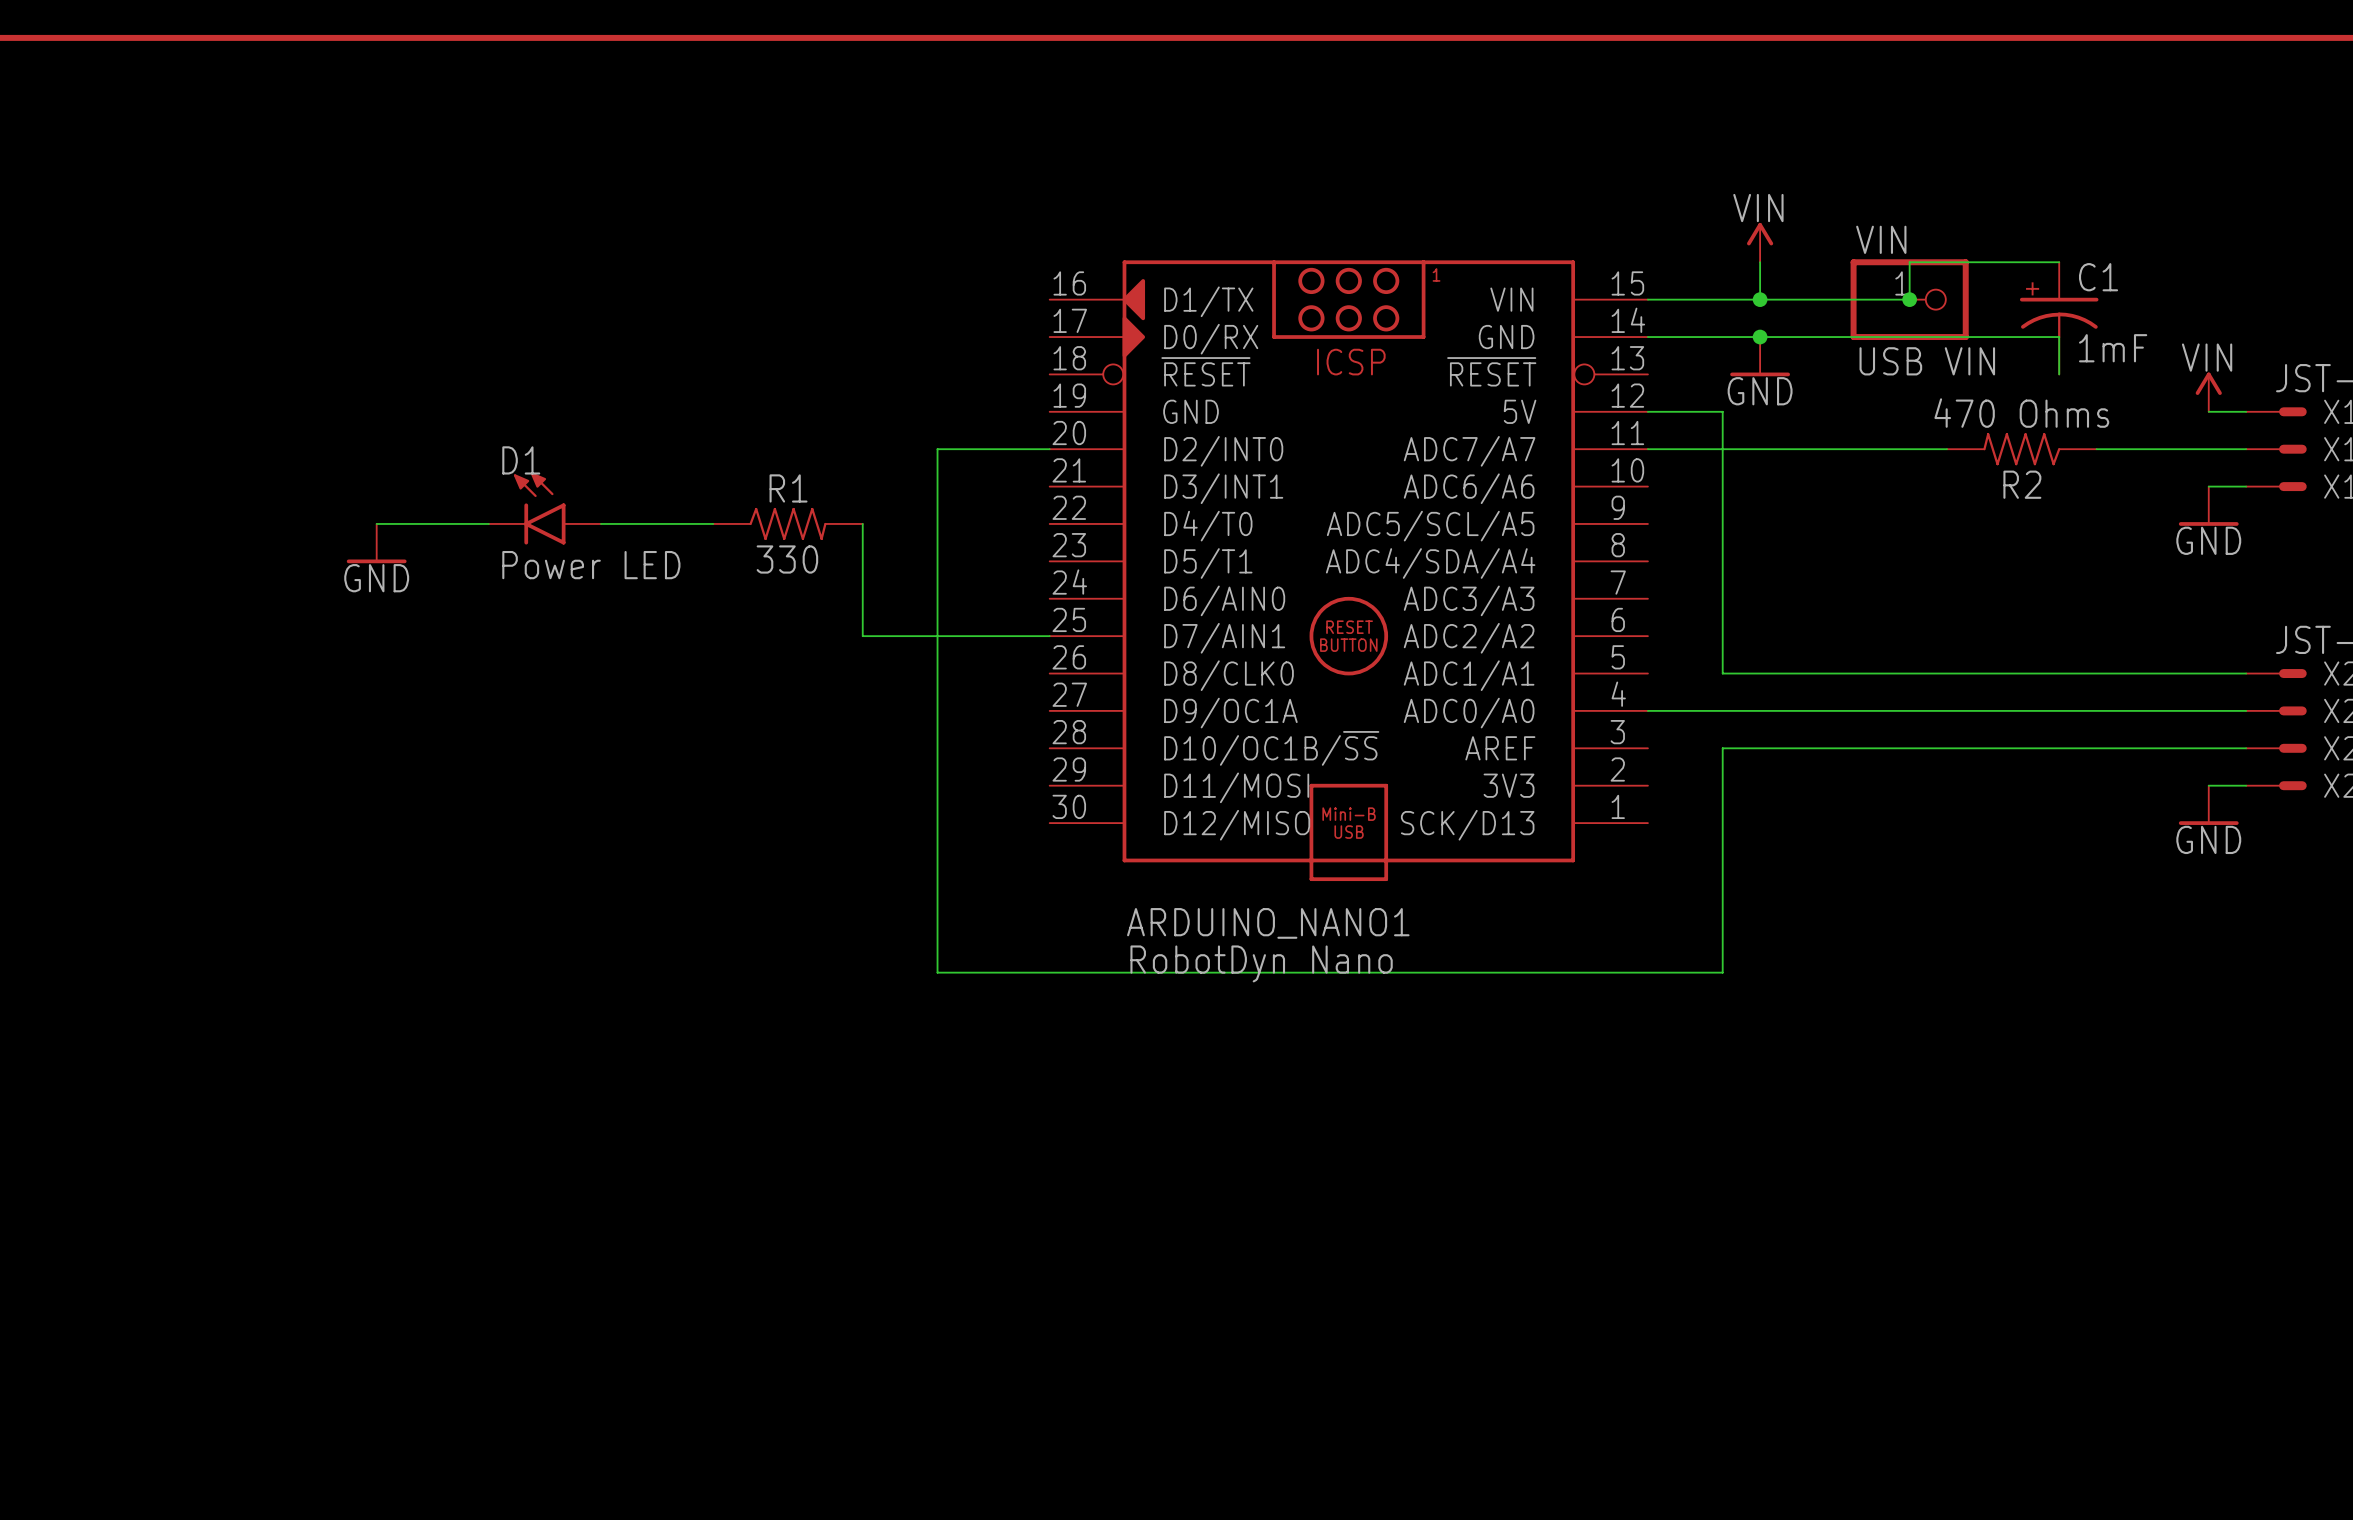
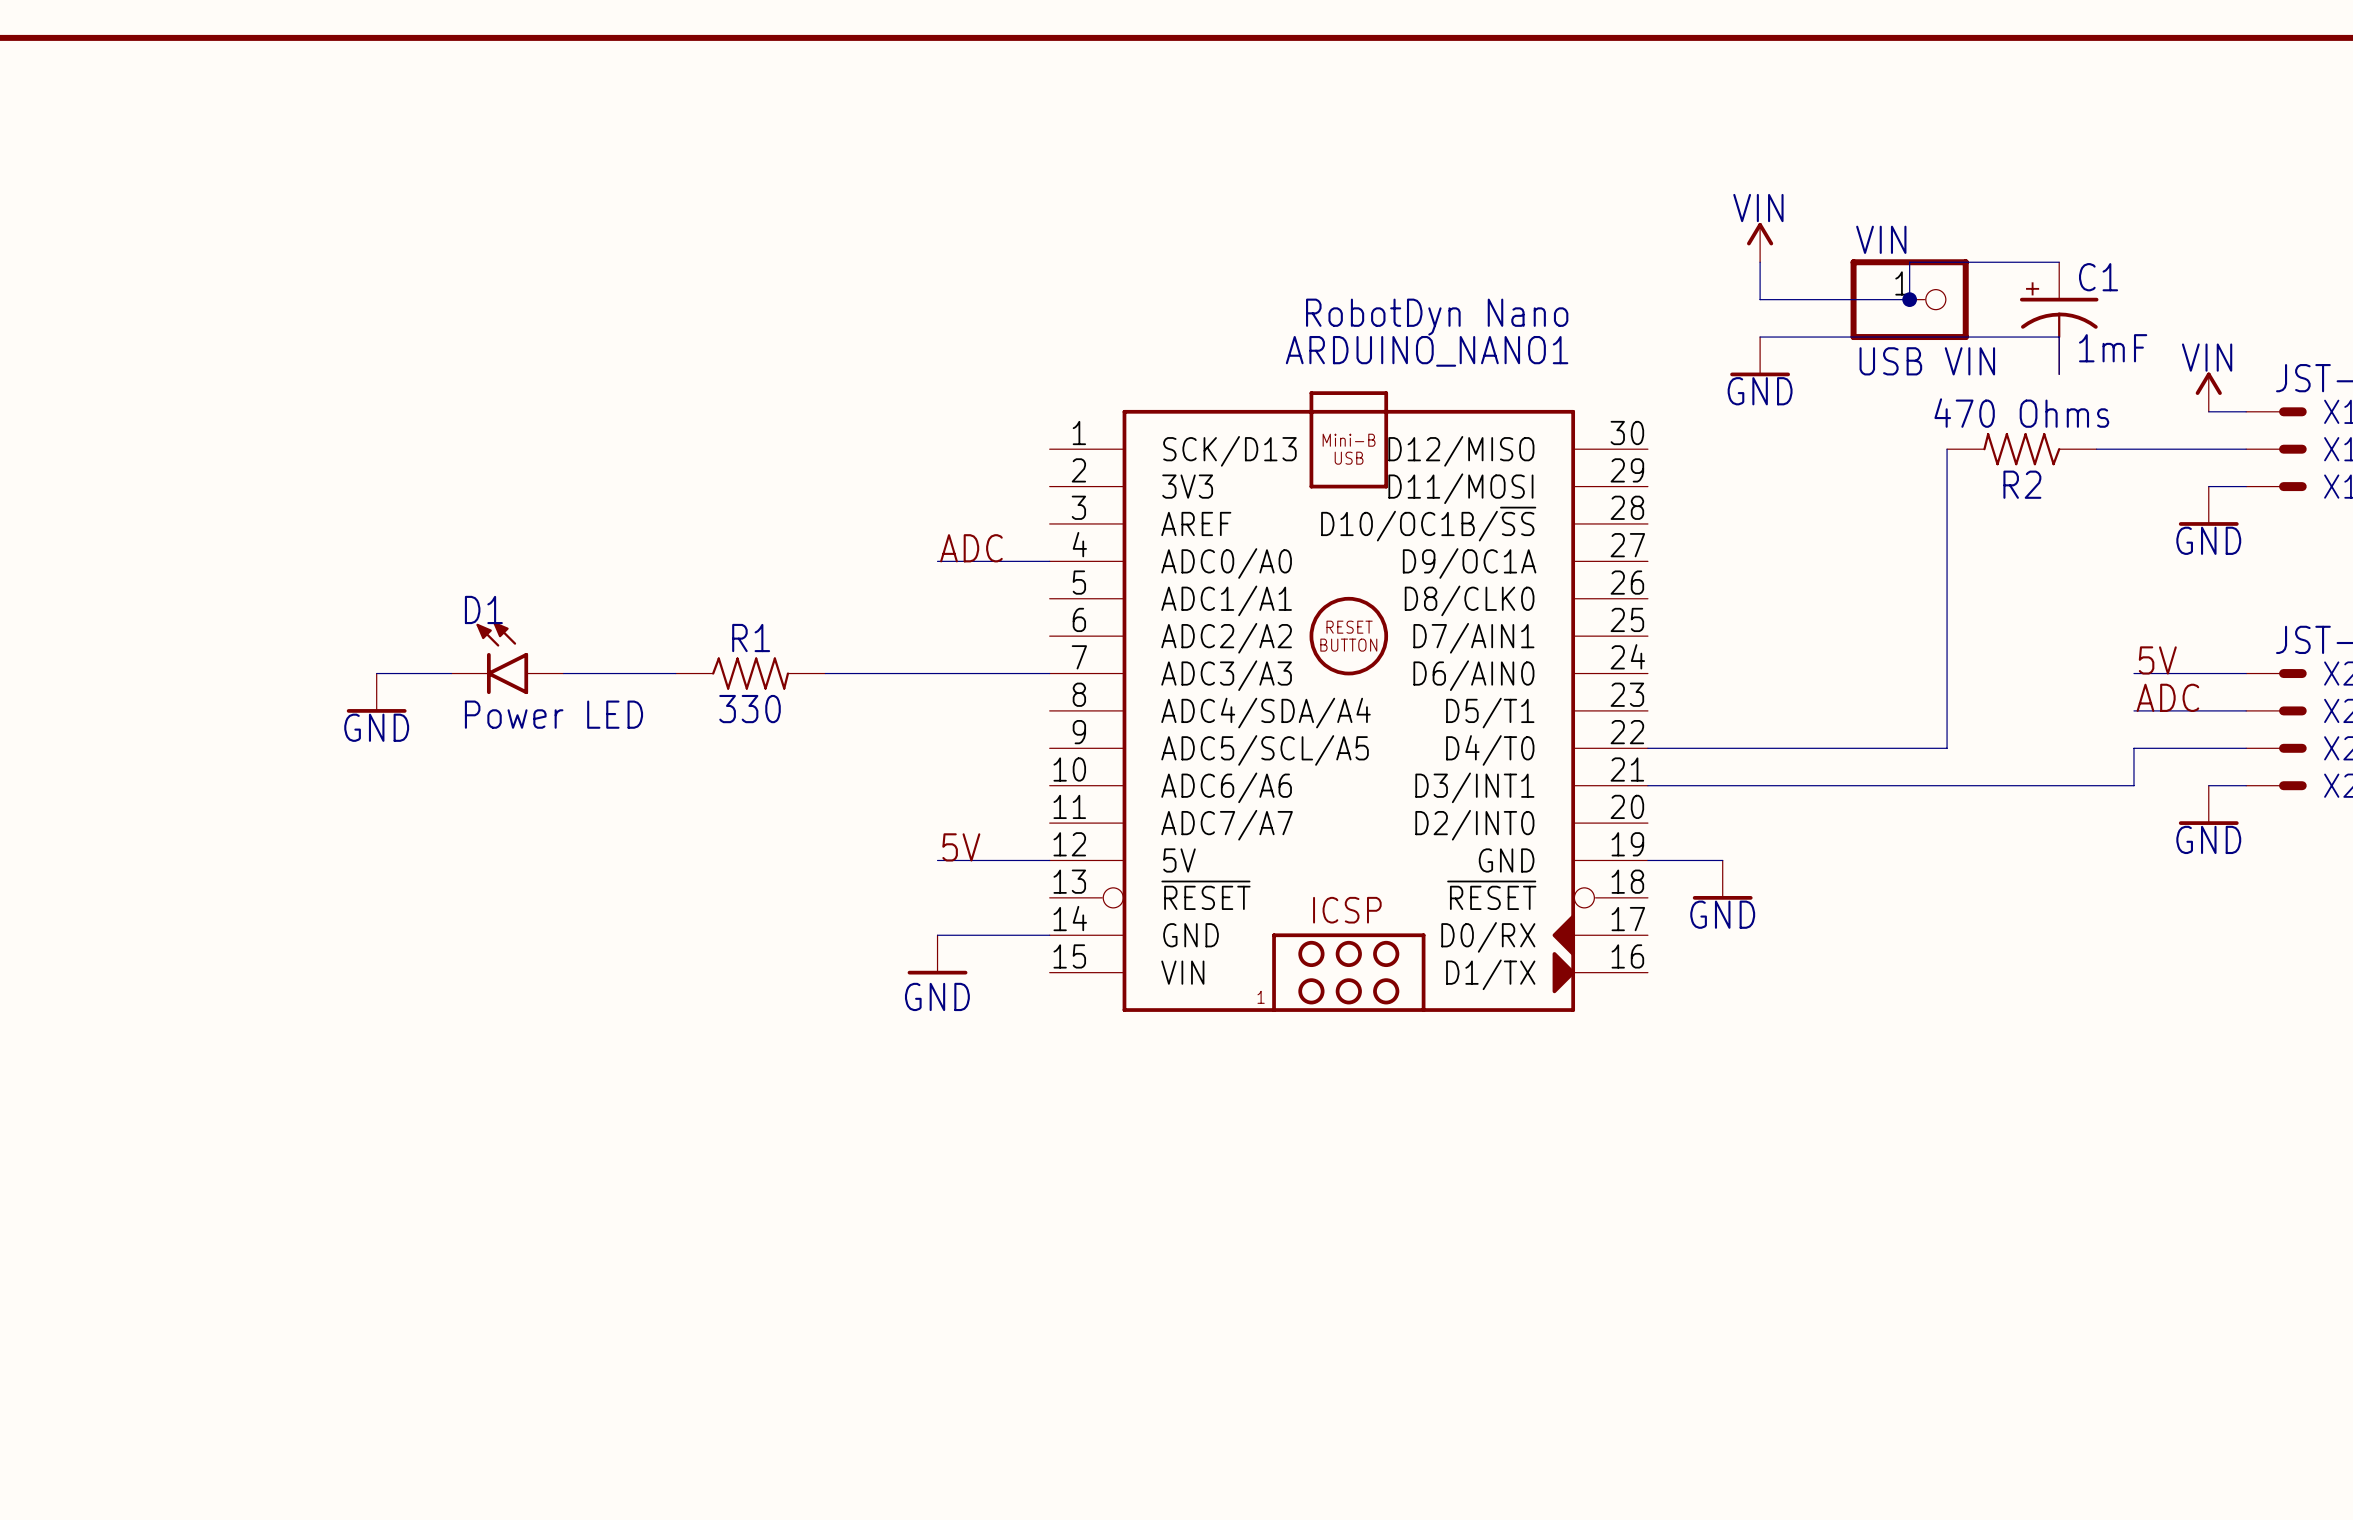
ARDUINO_NANO1 symbol: [1049, 260, 1648, 882] -> [1049, 391, 1648, 1012]
wire: (1647, 299) (1760, 299) -> none
junction: (1760, 299) -> none
wire: (1647, 337) (1760, 337) -> none
junction: (1760, 337) -> none
wire: (1647, 411) (1722, 411) (1722, 673) (2133, 673) -> none
wire: (1049, 449) (937, 449) (937, 972) (1722, 972) (1722, 748) -> (1647, 748) (1722, 748)
wire: (1647, 449) (1947, 449) -> (1947, 748) (1947, 449)
D1 position: (544, 508) -> (507, 658)
wire: (376, 523) (488, 523) -> none
wire: (601, 523) (713, 523) -> (563, 673) (675, 673)
R1 position: (787, 523) -> (750, 673)
wire: (862, 523) (862, 636) (1049, 636) -> none
power symbol position: GND (376, 543) -> GND (376, 693)
label: none -> ADC (971, 548)
wire: none -> (937, 561) (1049, 561)
label: none -> 5V (2157, 660)
wire: none -> (376, 673) (451, 673)
wire: none -> (825, 673) (1049, 673)
label: none -> ADC (2167, 697)
wire: (1647, 710) (2133, 710) -> none
wire: (1947, 748) (2133, 748) -> (1647, 785) (2133, 785) (2133, 748)
label: none -> 5V (961, 847)
wire: none -> (937, 860) (1049, 860)
wire: none -> (1647, 860) (1722, 860)
power symbol: none -> GND (1722, 880)
ARDUINO_NANO1 name position: ARDUINO_NANO1 (1268, 923) -> ARDUINO_NANO1 (1427, 351)
wire: none -> (937, 935) (1049, 935)
power symbol: none -> GND (937, 954)
ARDUINO_NANO1 value position: RobotDyn Nano (1261, 963) -> RobotDyn Nano (1437, 317)

